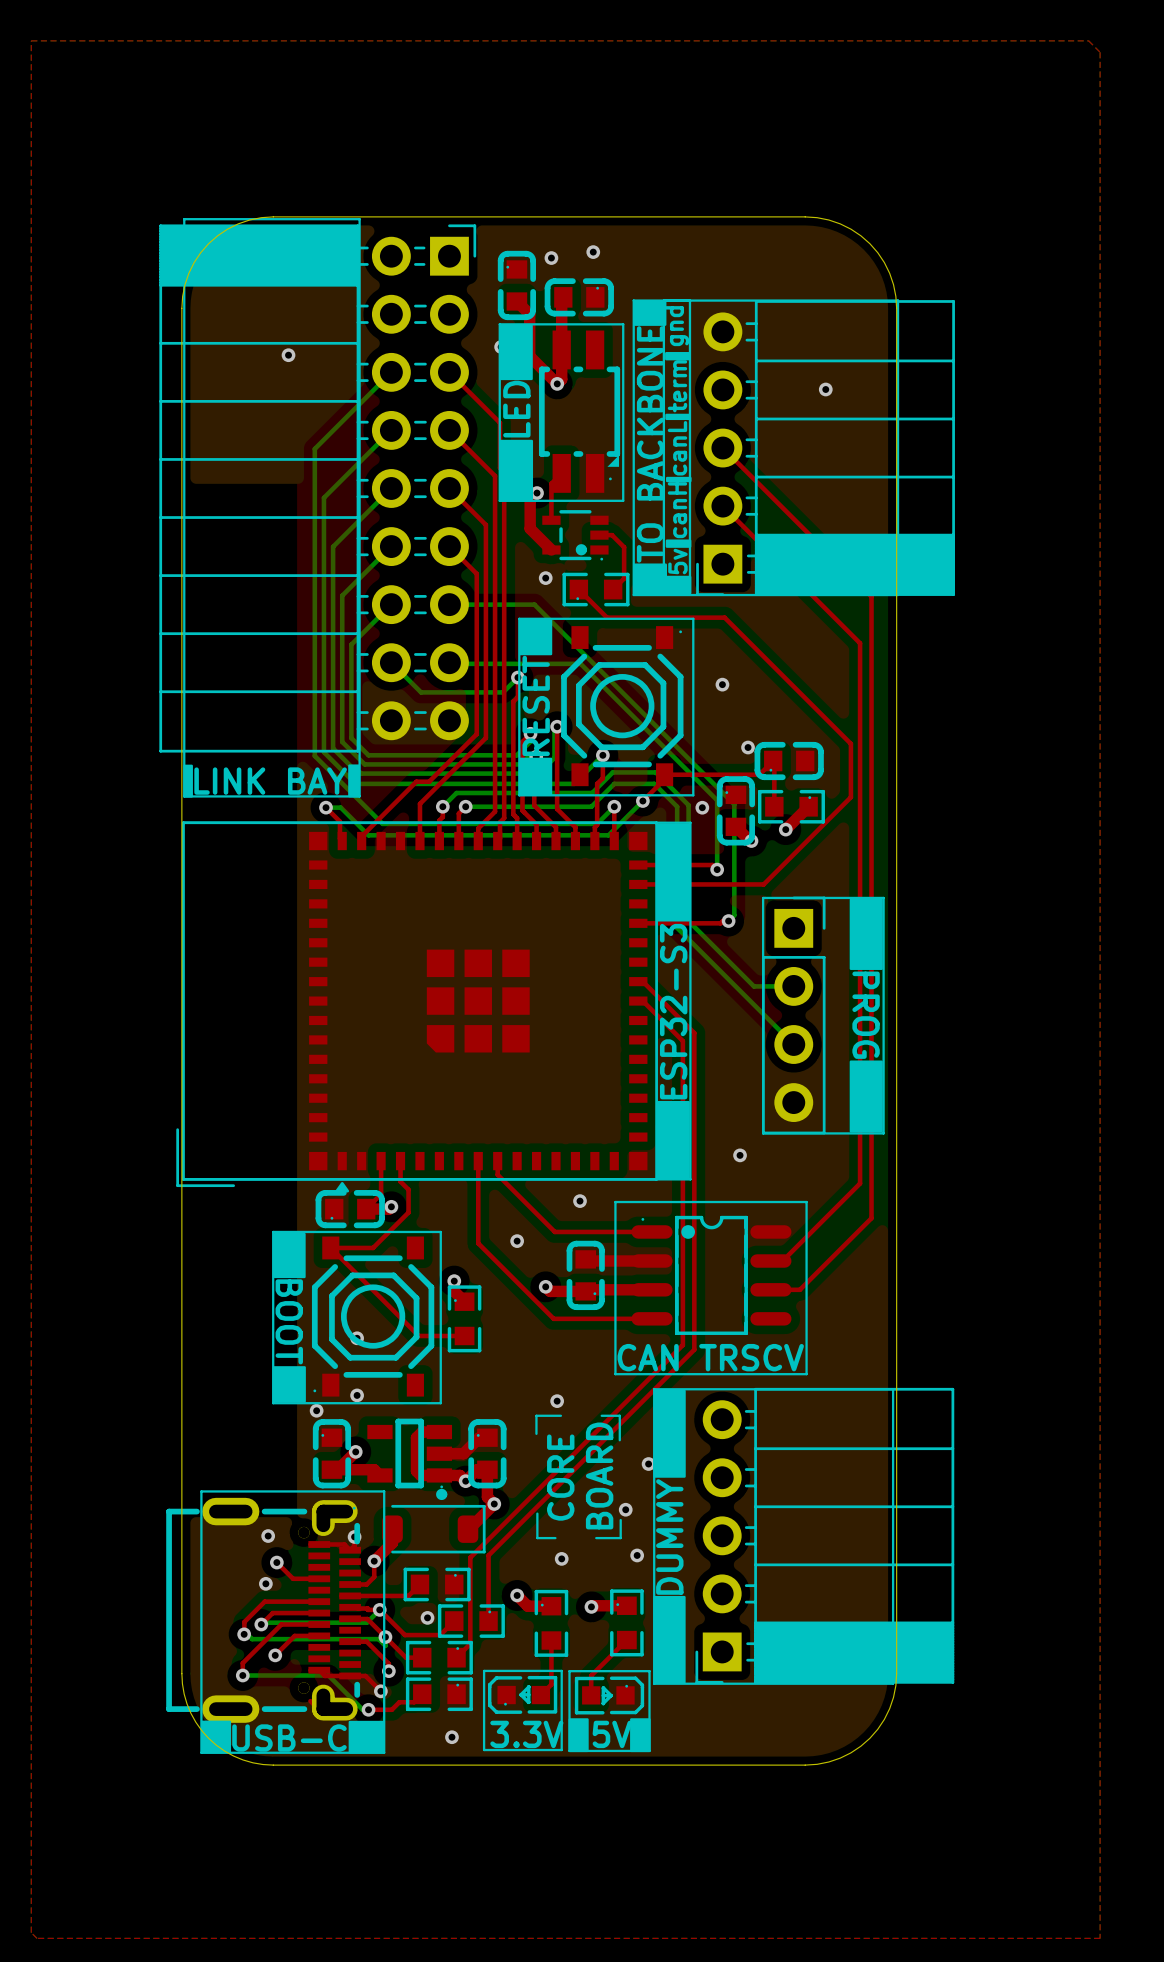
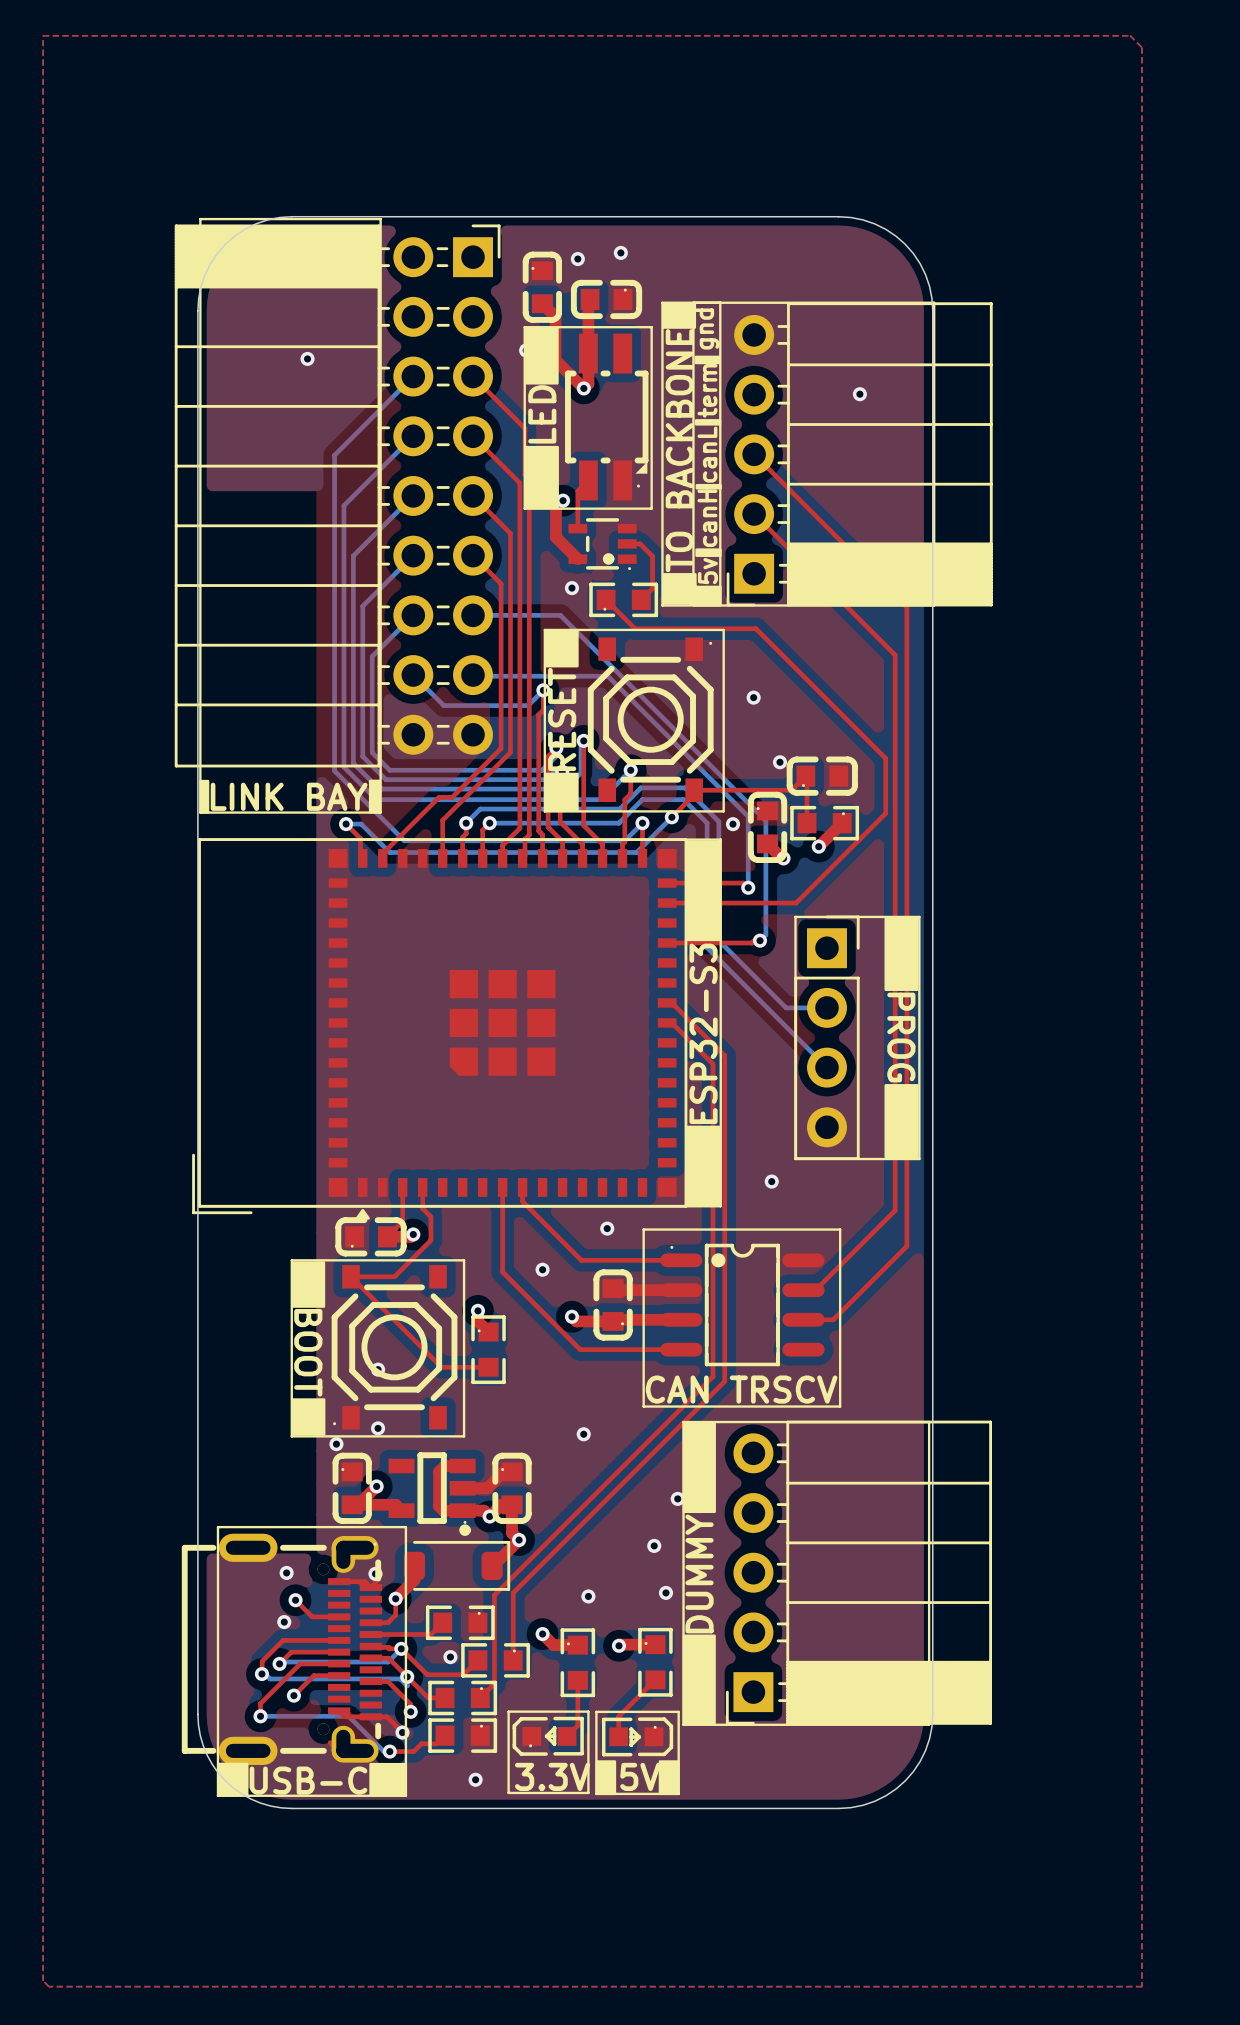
line: (560, 1415) (536, 1415) (536, 1433) -> none
line: (601, 1415) (619, 1415) (619, 1440) -> none
text: BOARD (599, 1475) -> none
text: CORE (560, 1477) -> none
line: (537, 1513) (537, 1538) (555, 1538) -> none
line: (620, 1520) (620, 1538) (596, 1538) -> none

